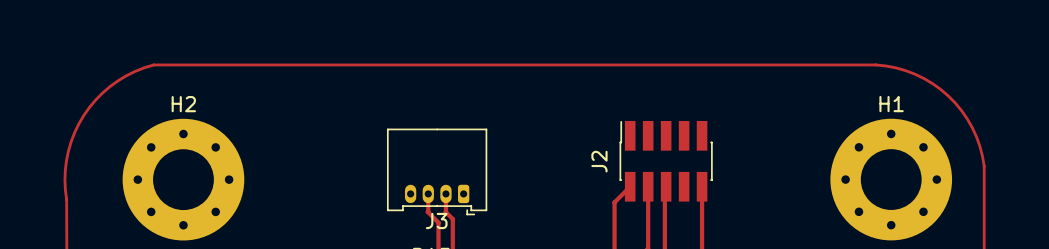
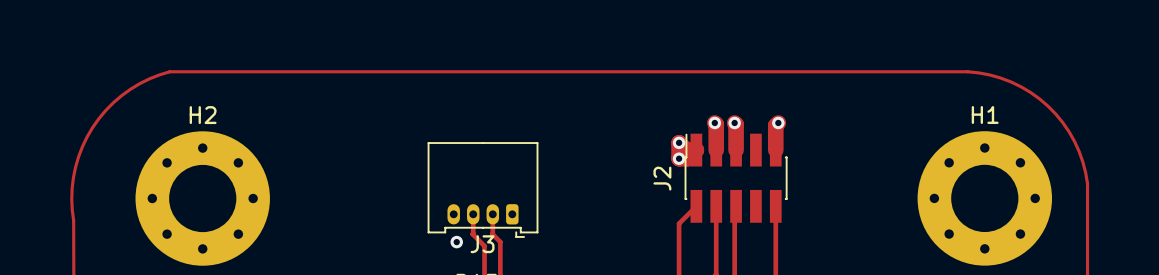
track: none -> (714, 122) (716, 150)
via: none -> (714, 122)
track: none -> (734, 122) (736, 150)
via: none -> (734, 122)
track: none -> (778, 122) (775, 125) (775, 150)
via: none -> (778, 122)
track: none -> (679, 142) (679, 158) (687, 158) (696, 150) (686, 150) (679, 142)
via: none -> (679, 142)
via: none -> (679, 158)
via: none -> (456, 242)

